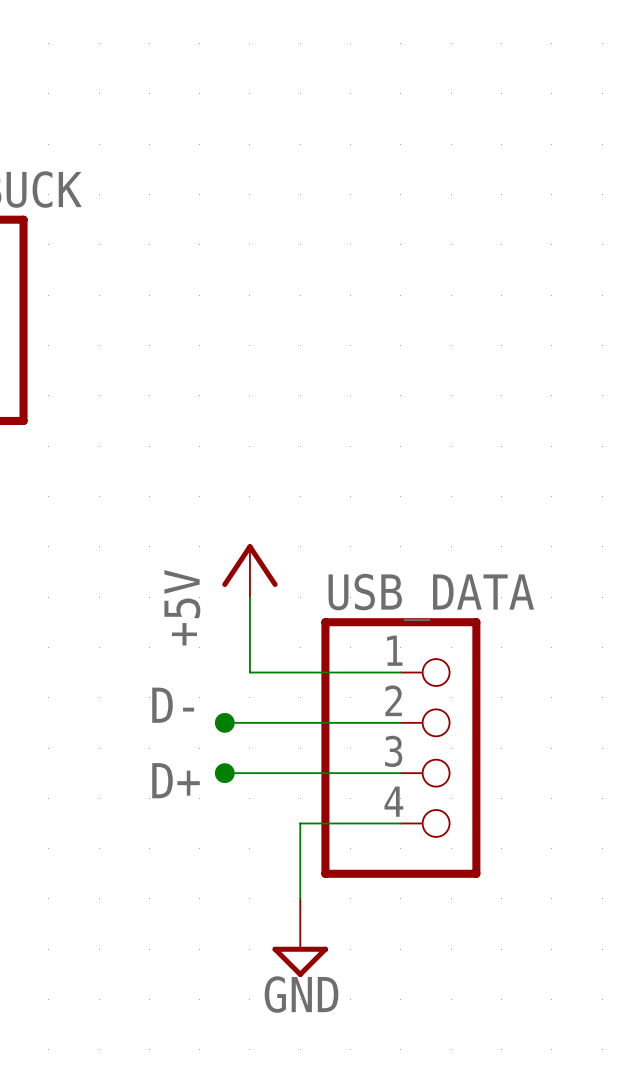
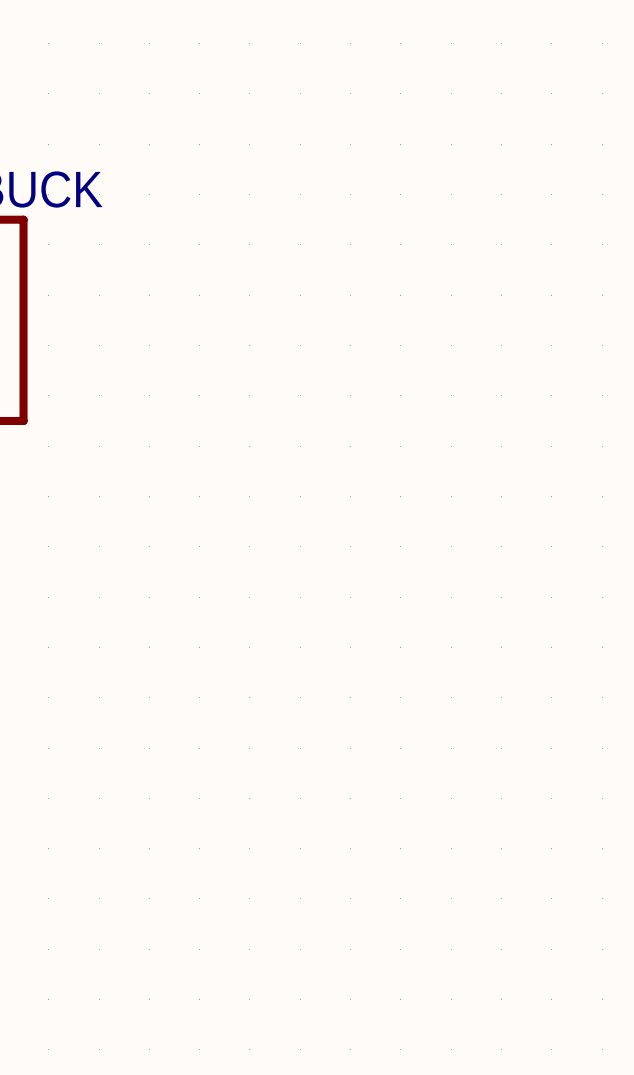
power symbol: +5V (249, 570) -> none
wire: (249, 597) (249, 672) (400, 672) -> none
label: D- (173, 705) -> none
wire: (224, 722) (400, 722) -> none
junction: (224, 722) -> none
USB_DATA: (400, 748) -> none
wire: (224, 773) (400, 773) -> none
junction: (224, 773) -> none
label: D+ (176, 780) -> none
wire: (400, 823) (300, 823) (300, 898) -> none
power symbol: GND (300, 937) -> none

